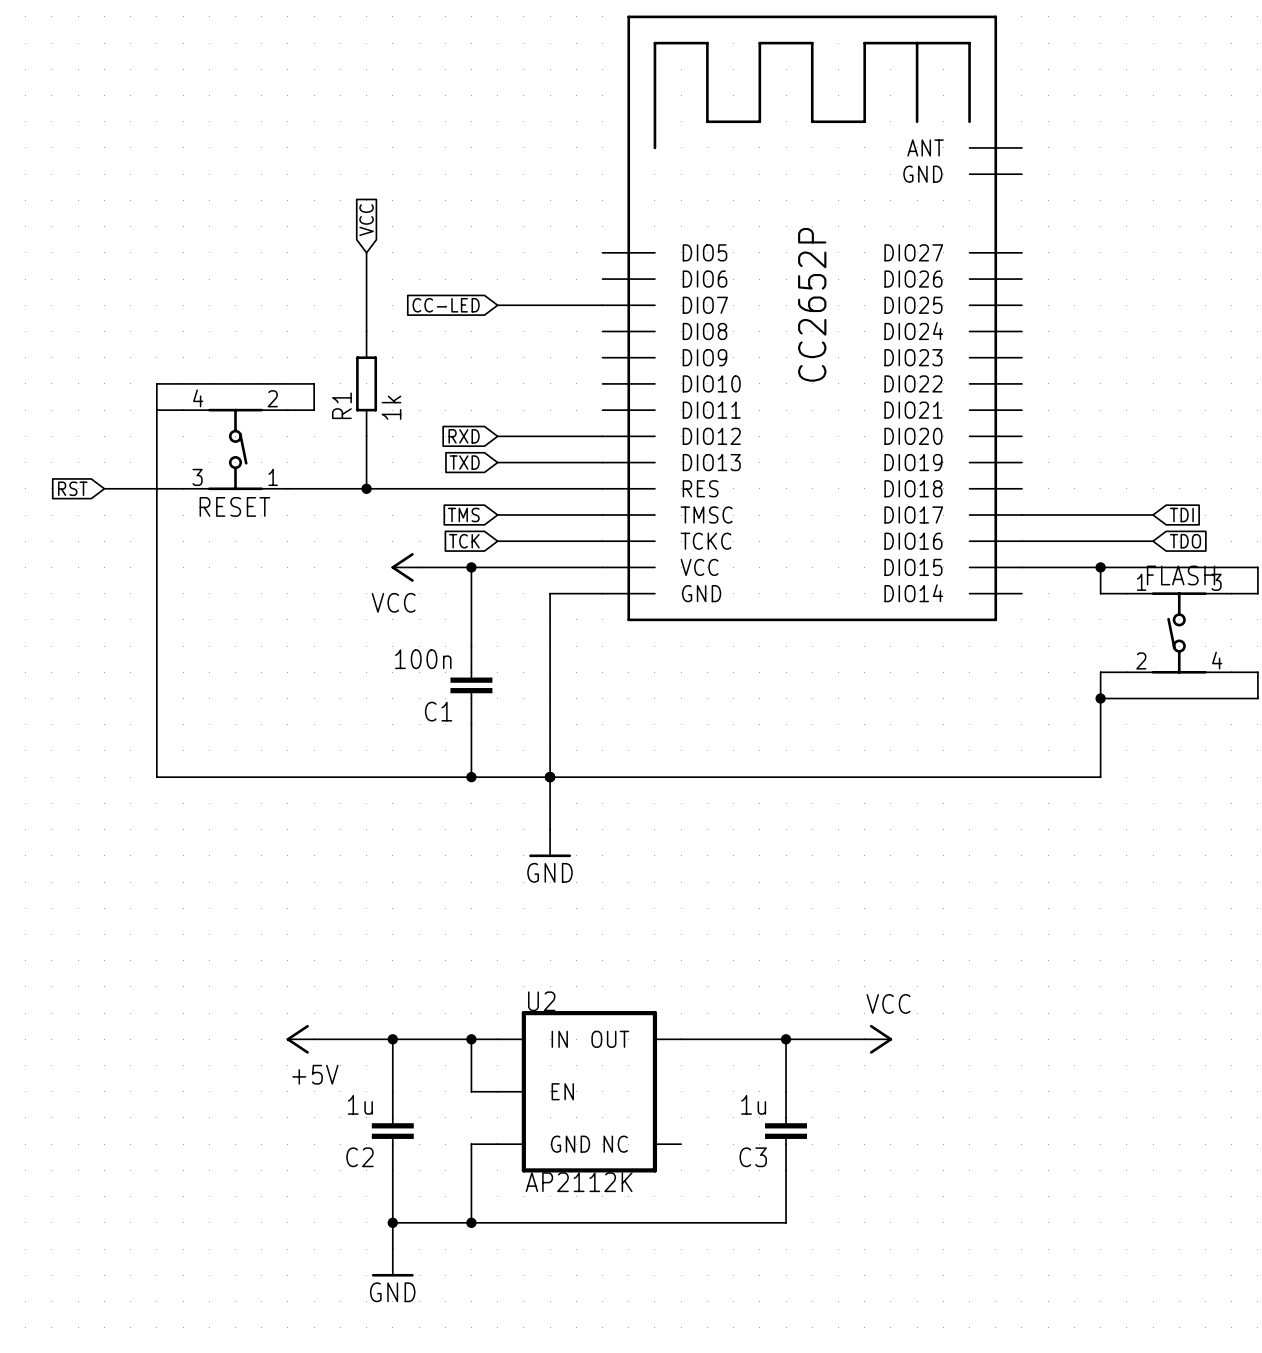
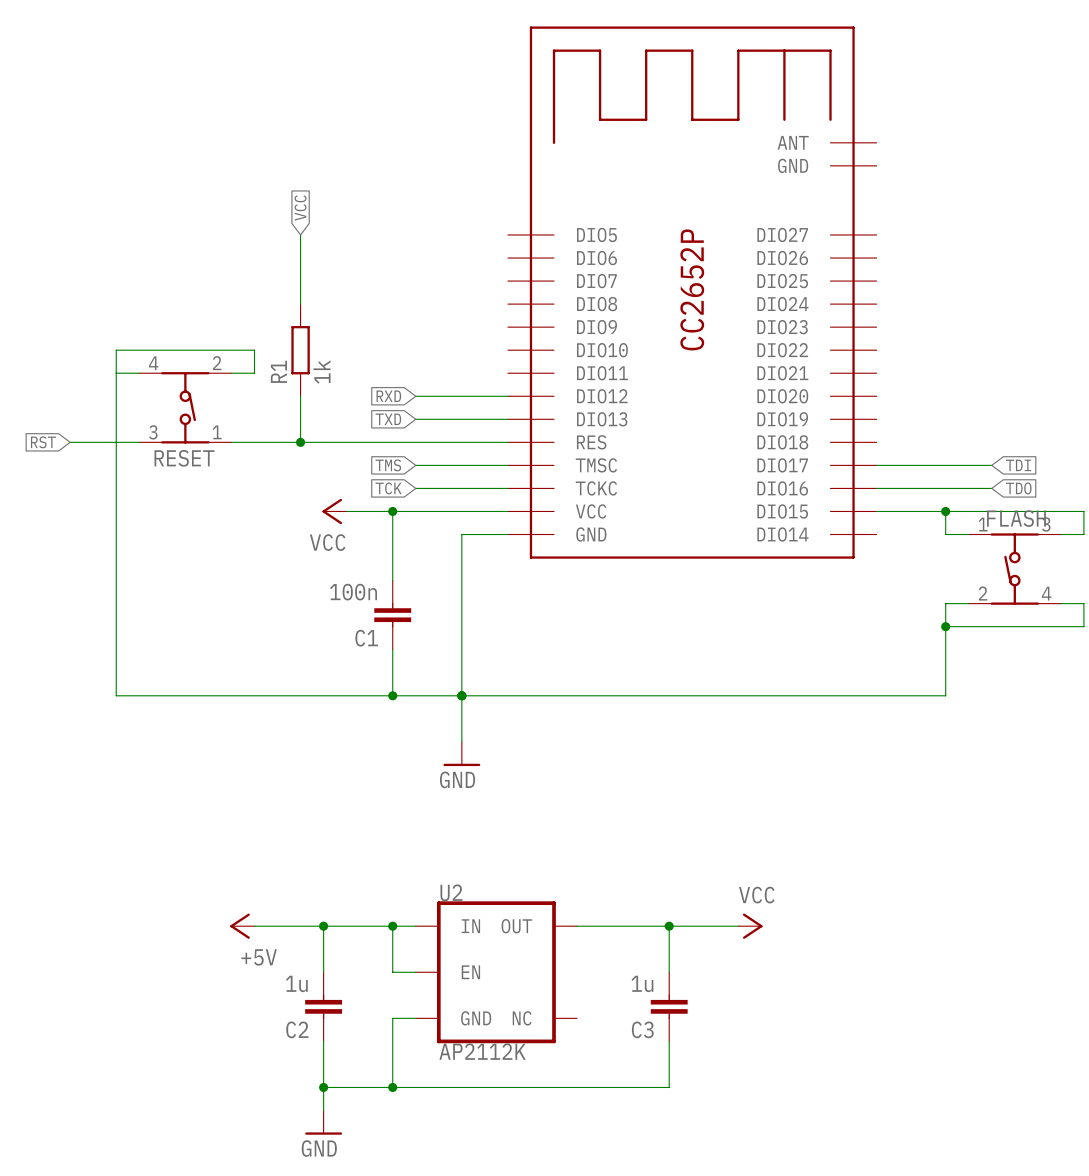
global label: CC-LED (446, 305) -> none
wire: (497, 305) (602, 305) -> none

